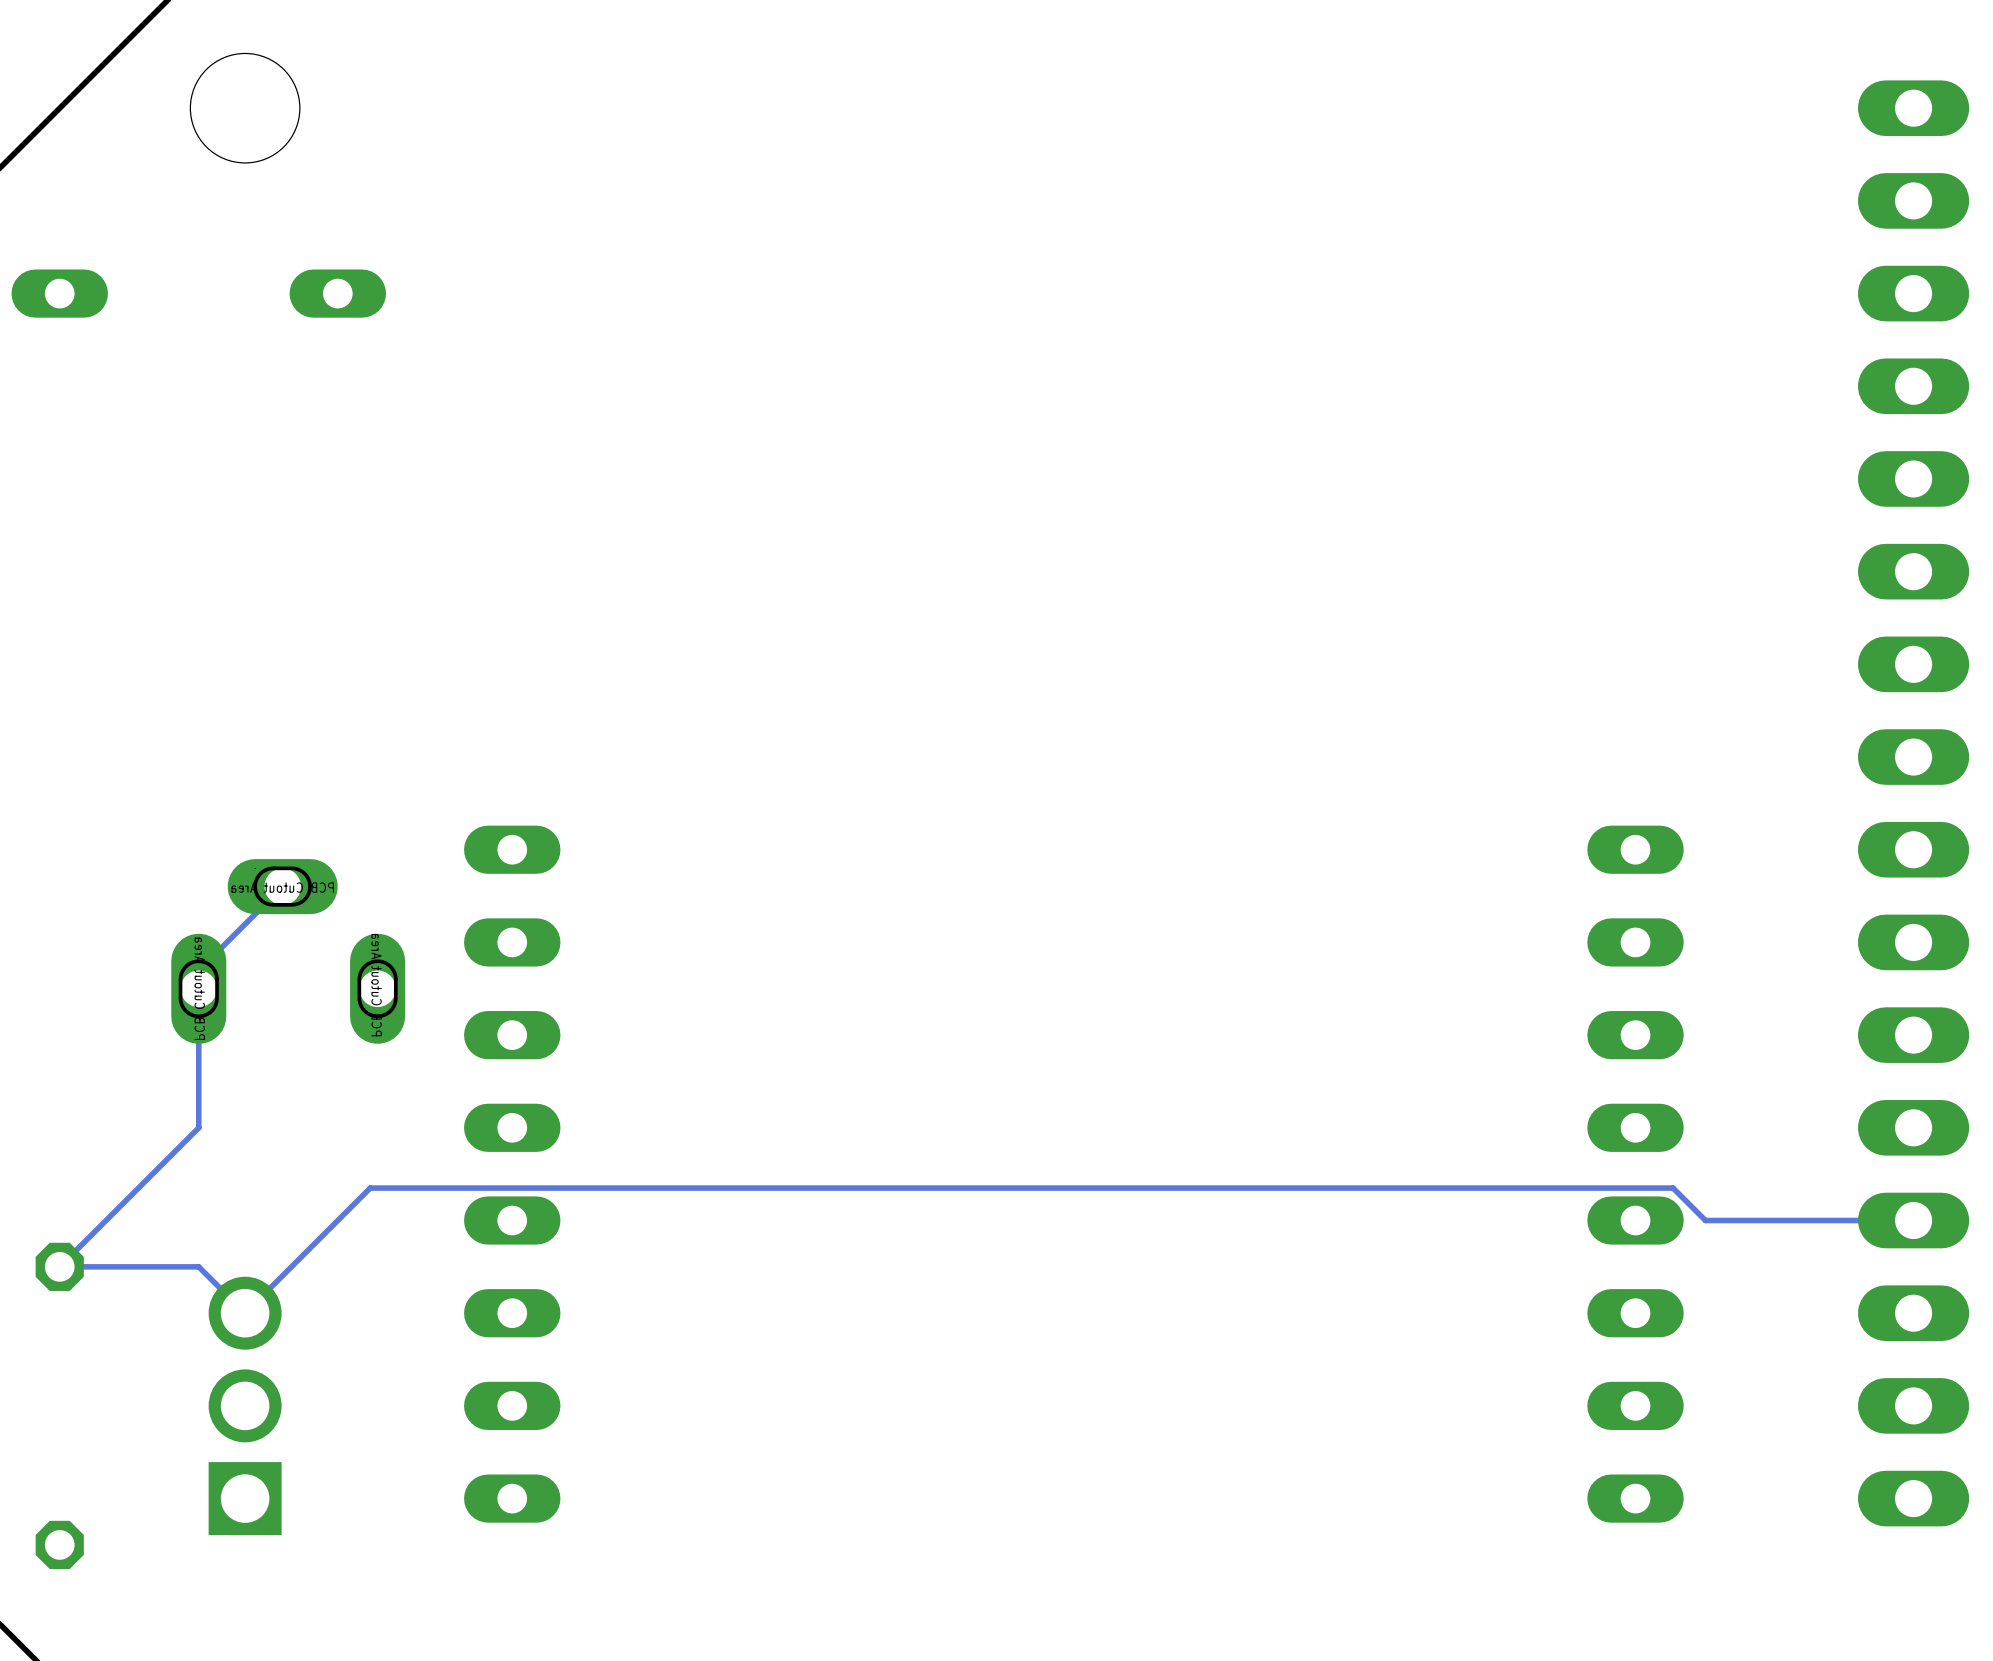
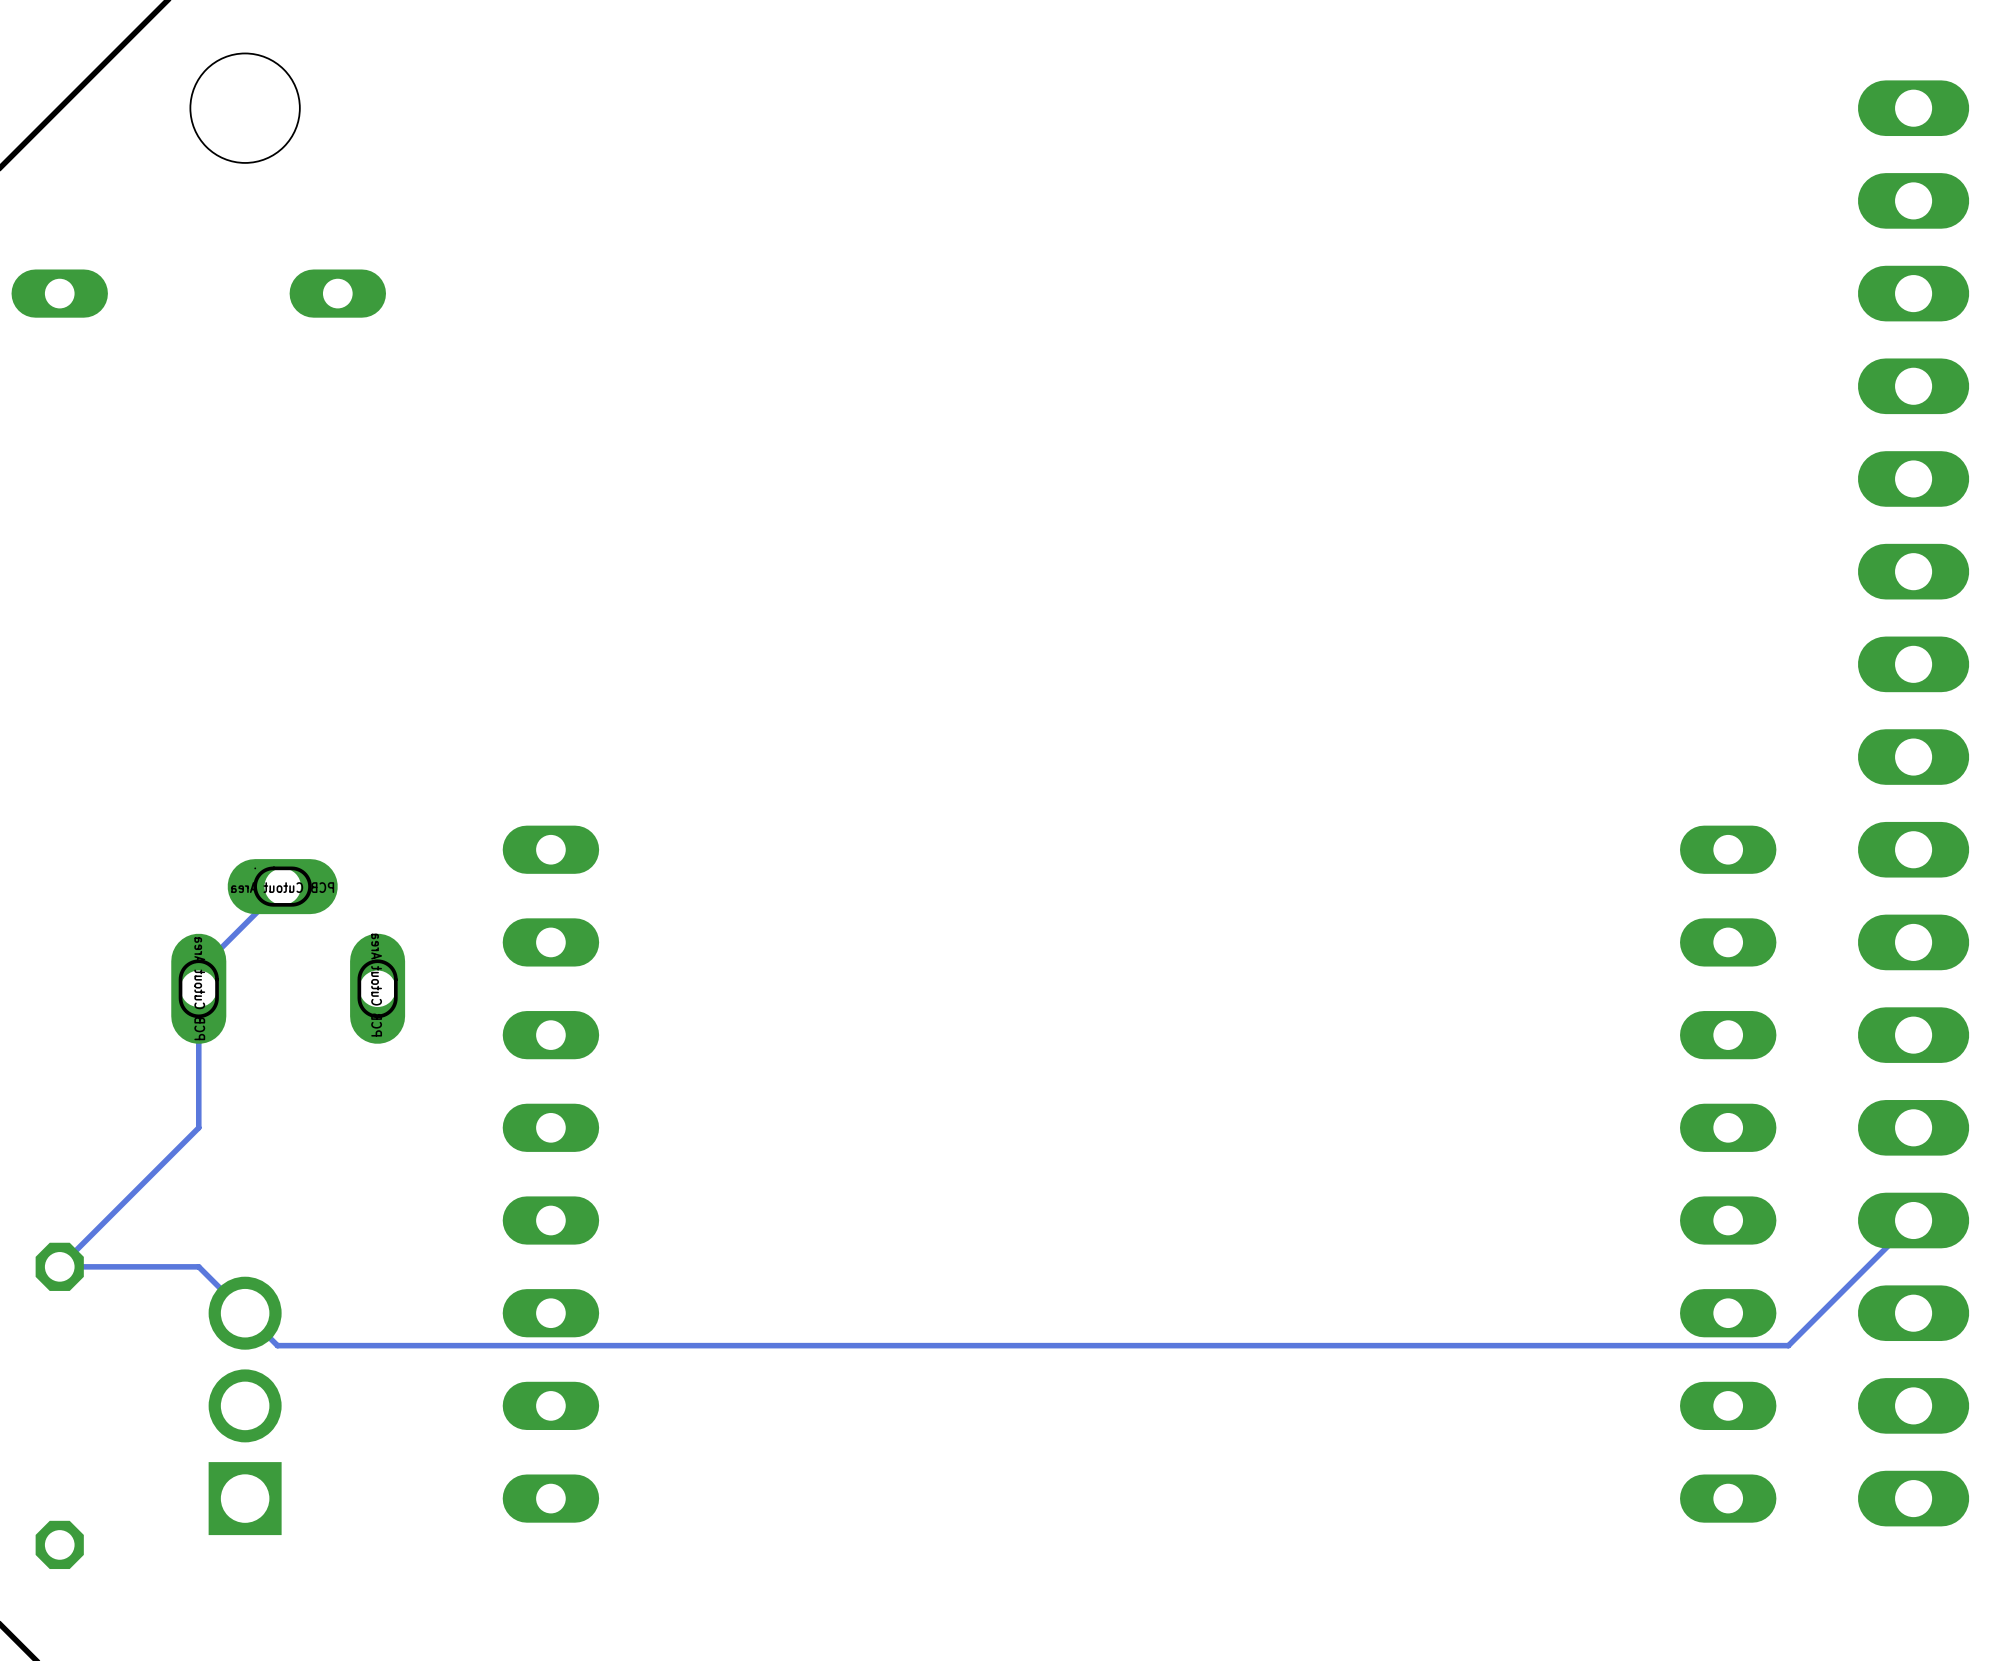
part position: (512, 1174) -> (550, 1174)
part position: (1635, 1174) -> (1728, 1174)
track: (1913, 1220) (1705, 1220) (1673, 1188) (370, 1188) (245, 1313) -> (1913, 1220) (1788, 1345) (277, 1345) (245, 1313)

